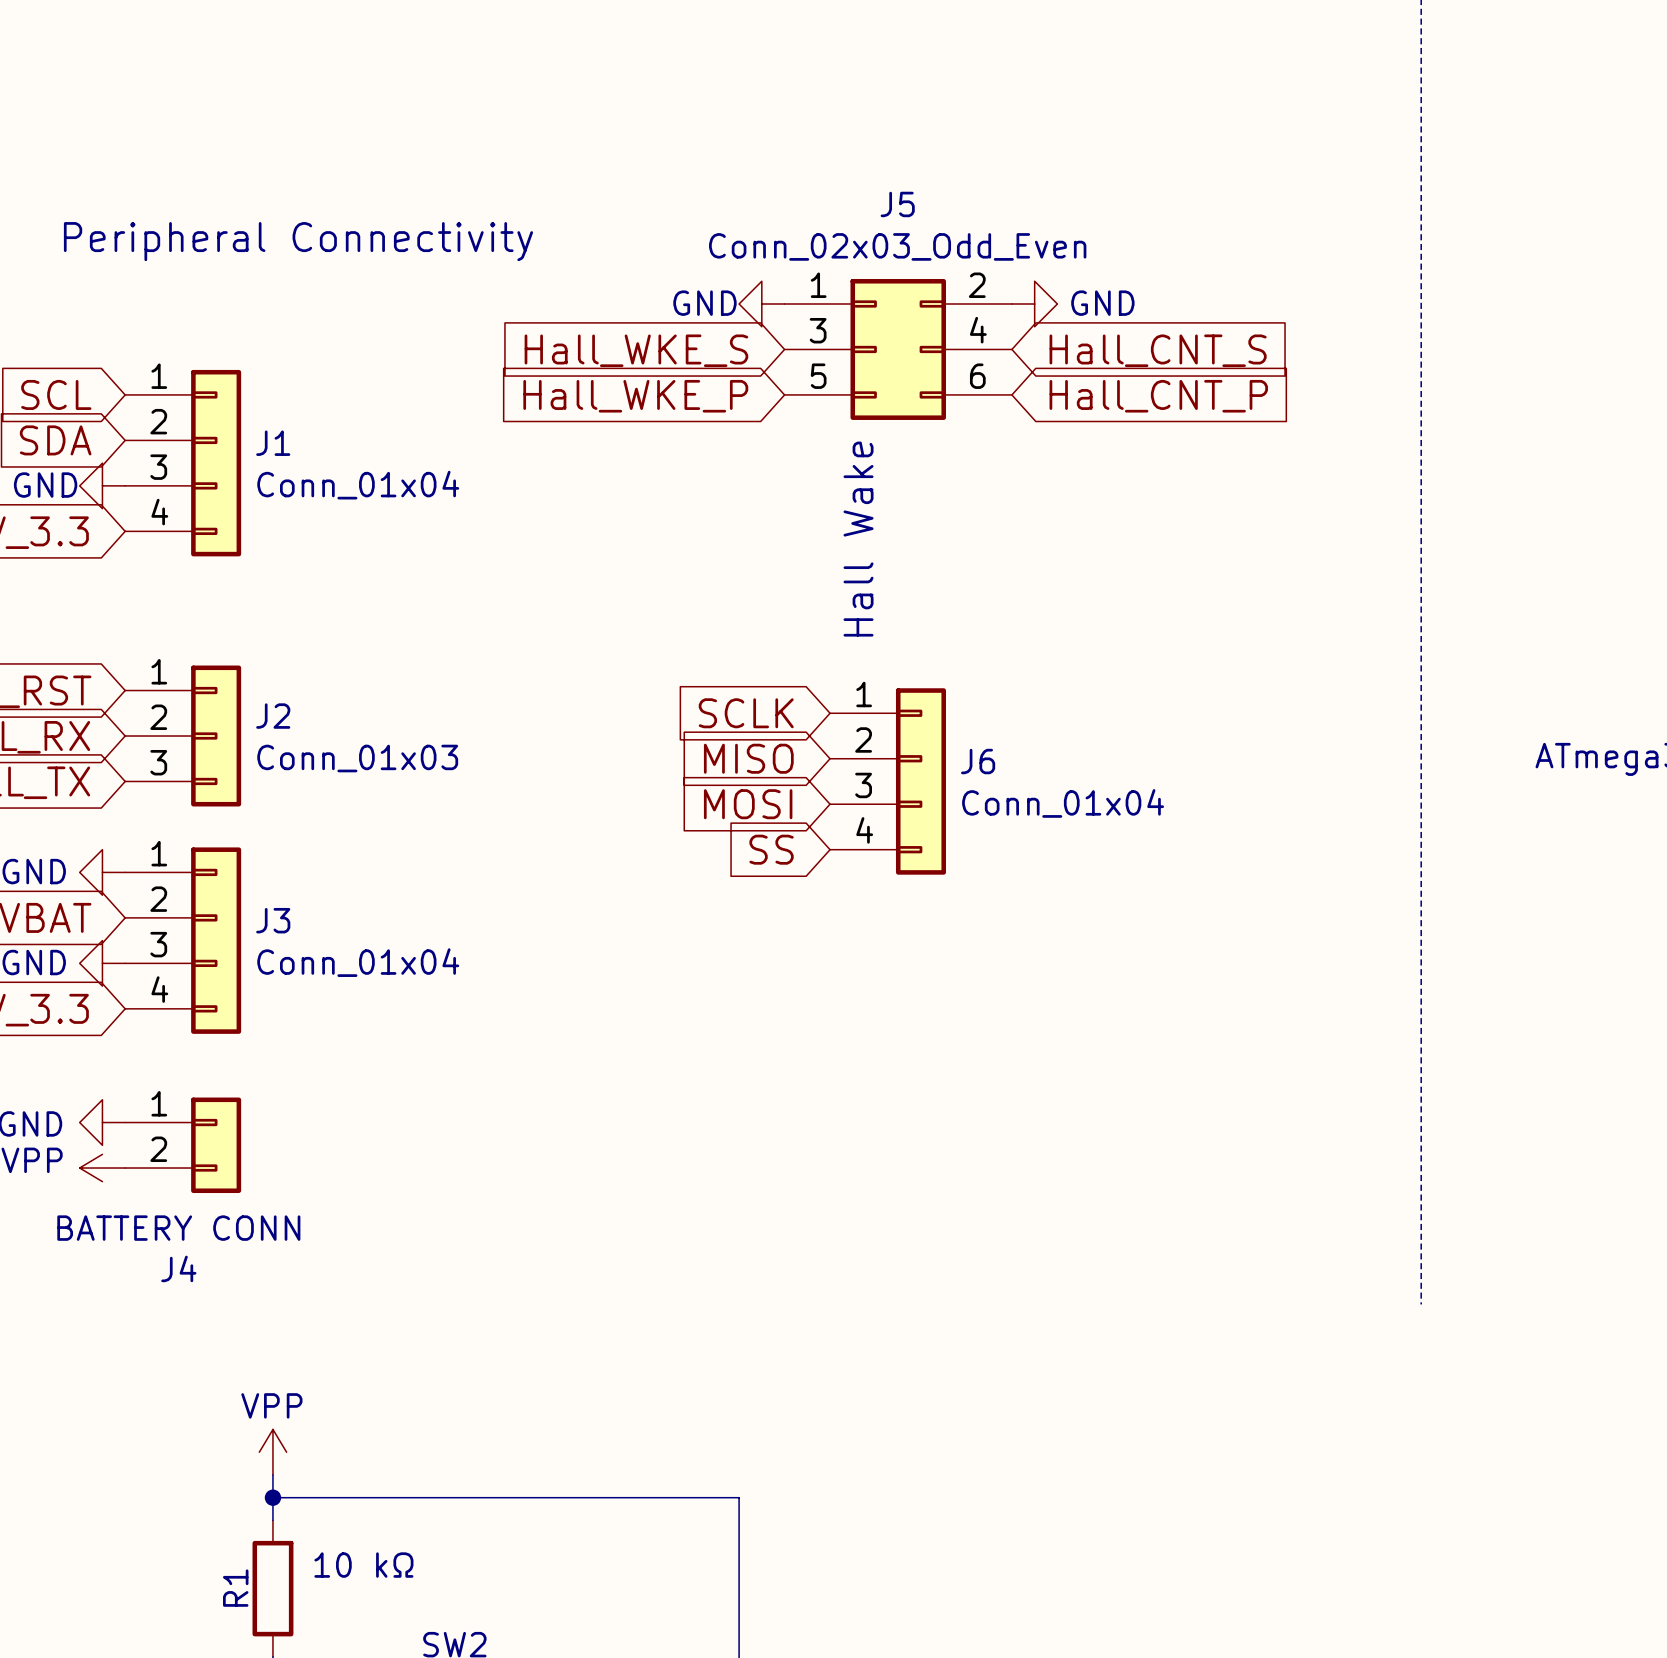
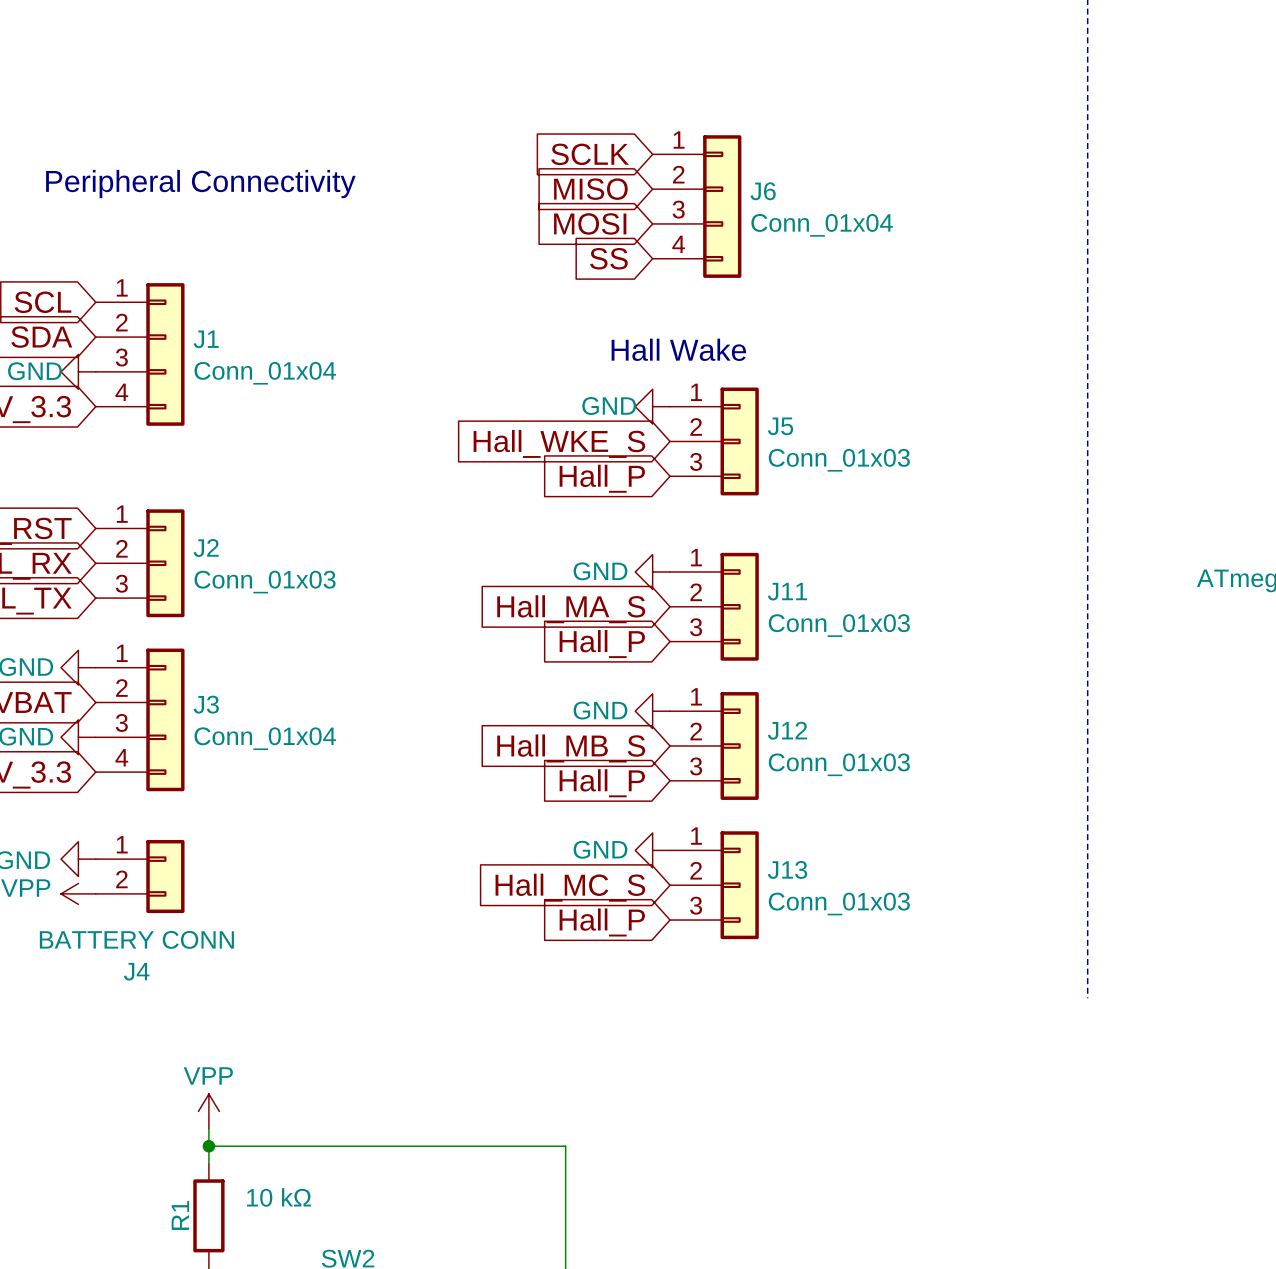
global label: none -> SCLK (590, 154)
J5 name position: J5 (897, 204) -> J5 (780, 426)
J5 value: Conn_02x03_Odd_Even (897, 246) -> Conn_01x03 (839, 460)
global label: none -> MISO (590, 189)
J5 symbol: [784, 278, 1012, 420] -> [670, 387, 759, 496]
global label: none -> MOSI (590, 223)
power symbol: GND (761, 304) -> none
power symbol: GND (1034, 304) -> none
global label: none -> SS (608, 258)
global label position: Hall_WKE_S (636, 350) -> Hall_WKE_S (559, 443)
global label: Hall_CNT_S (1158, 350) -> none
global label: Hall_WKE_P (635, 396) -> none
global label: Hall_CNT_P (1158, 396) -> none
power symbol: none -> GND (652, 406)
text rotation: 0° (858, 539) -> 90° clockwise (678, 349)
global label: none -> Hall_P (602, 478)
global label: SCLK (746, 713) -> none
power symbol: none -> GND (652, 571)
global label: MISO (748, 758) -> none
J6 position: (888, 781) -> (697, 206)
J11: none -> Conn_01x03 (714, 606)
global label: none -> Hall_MA_S (571, 609)
global label: MOSI (748, 804) -> none
global label: none -> Hall_P (602, 644)
global label: SS (771, 849) -> none
power symbol: none -> GND (652, 711)
J12: none -> Conn_01x03 (714, 746)
global label: none -> Hall_MB_S (571, 748)
global label: none -> Hall_P (602, 783)
power symbol: none -> GND (652, 850)
J13: none -> Conn_01x03 (714, 885)
global label: none -> Hall_MC_S (570, 887)
global label: none -> Hall_P (602, 922)

